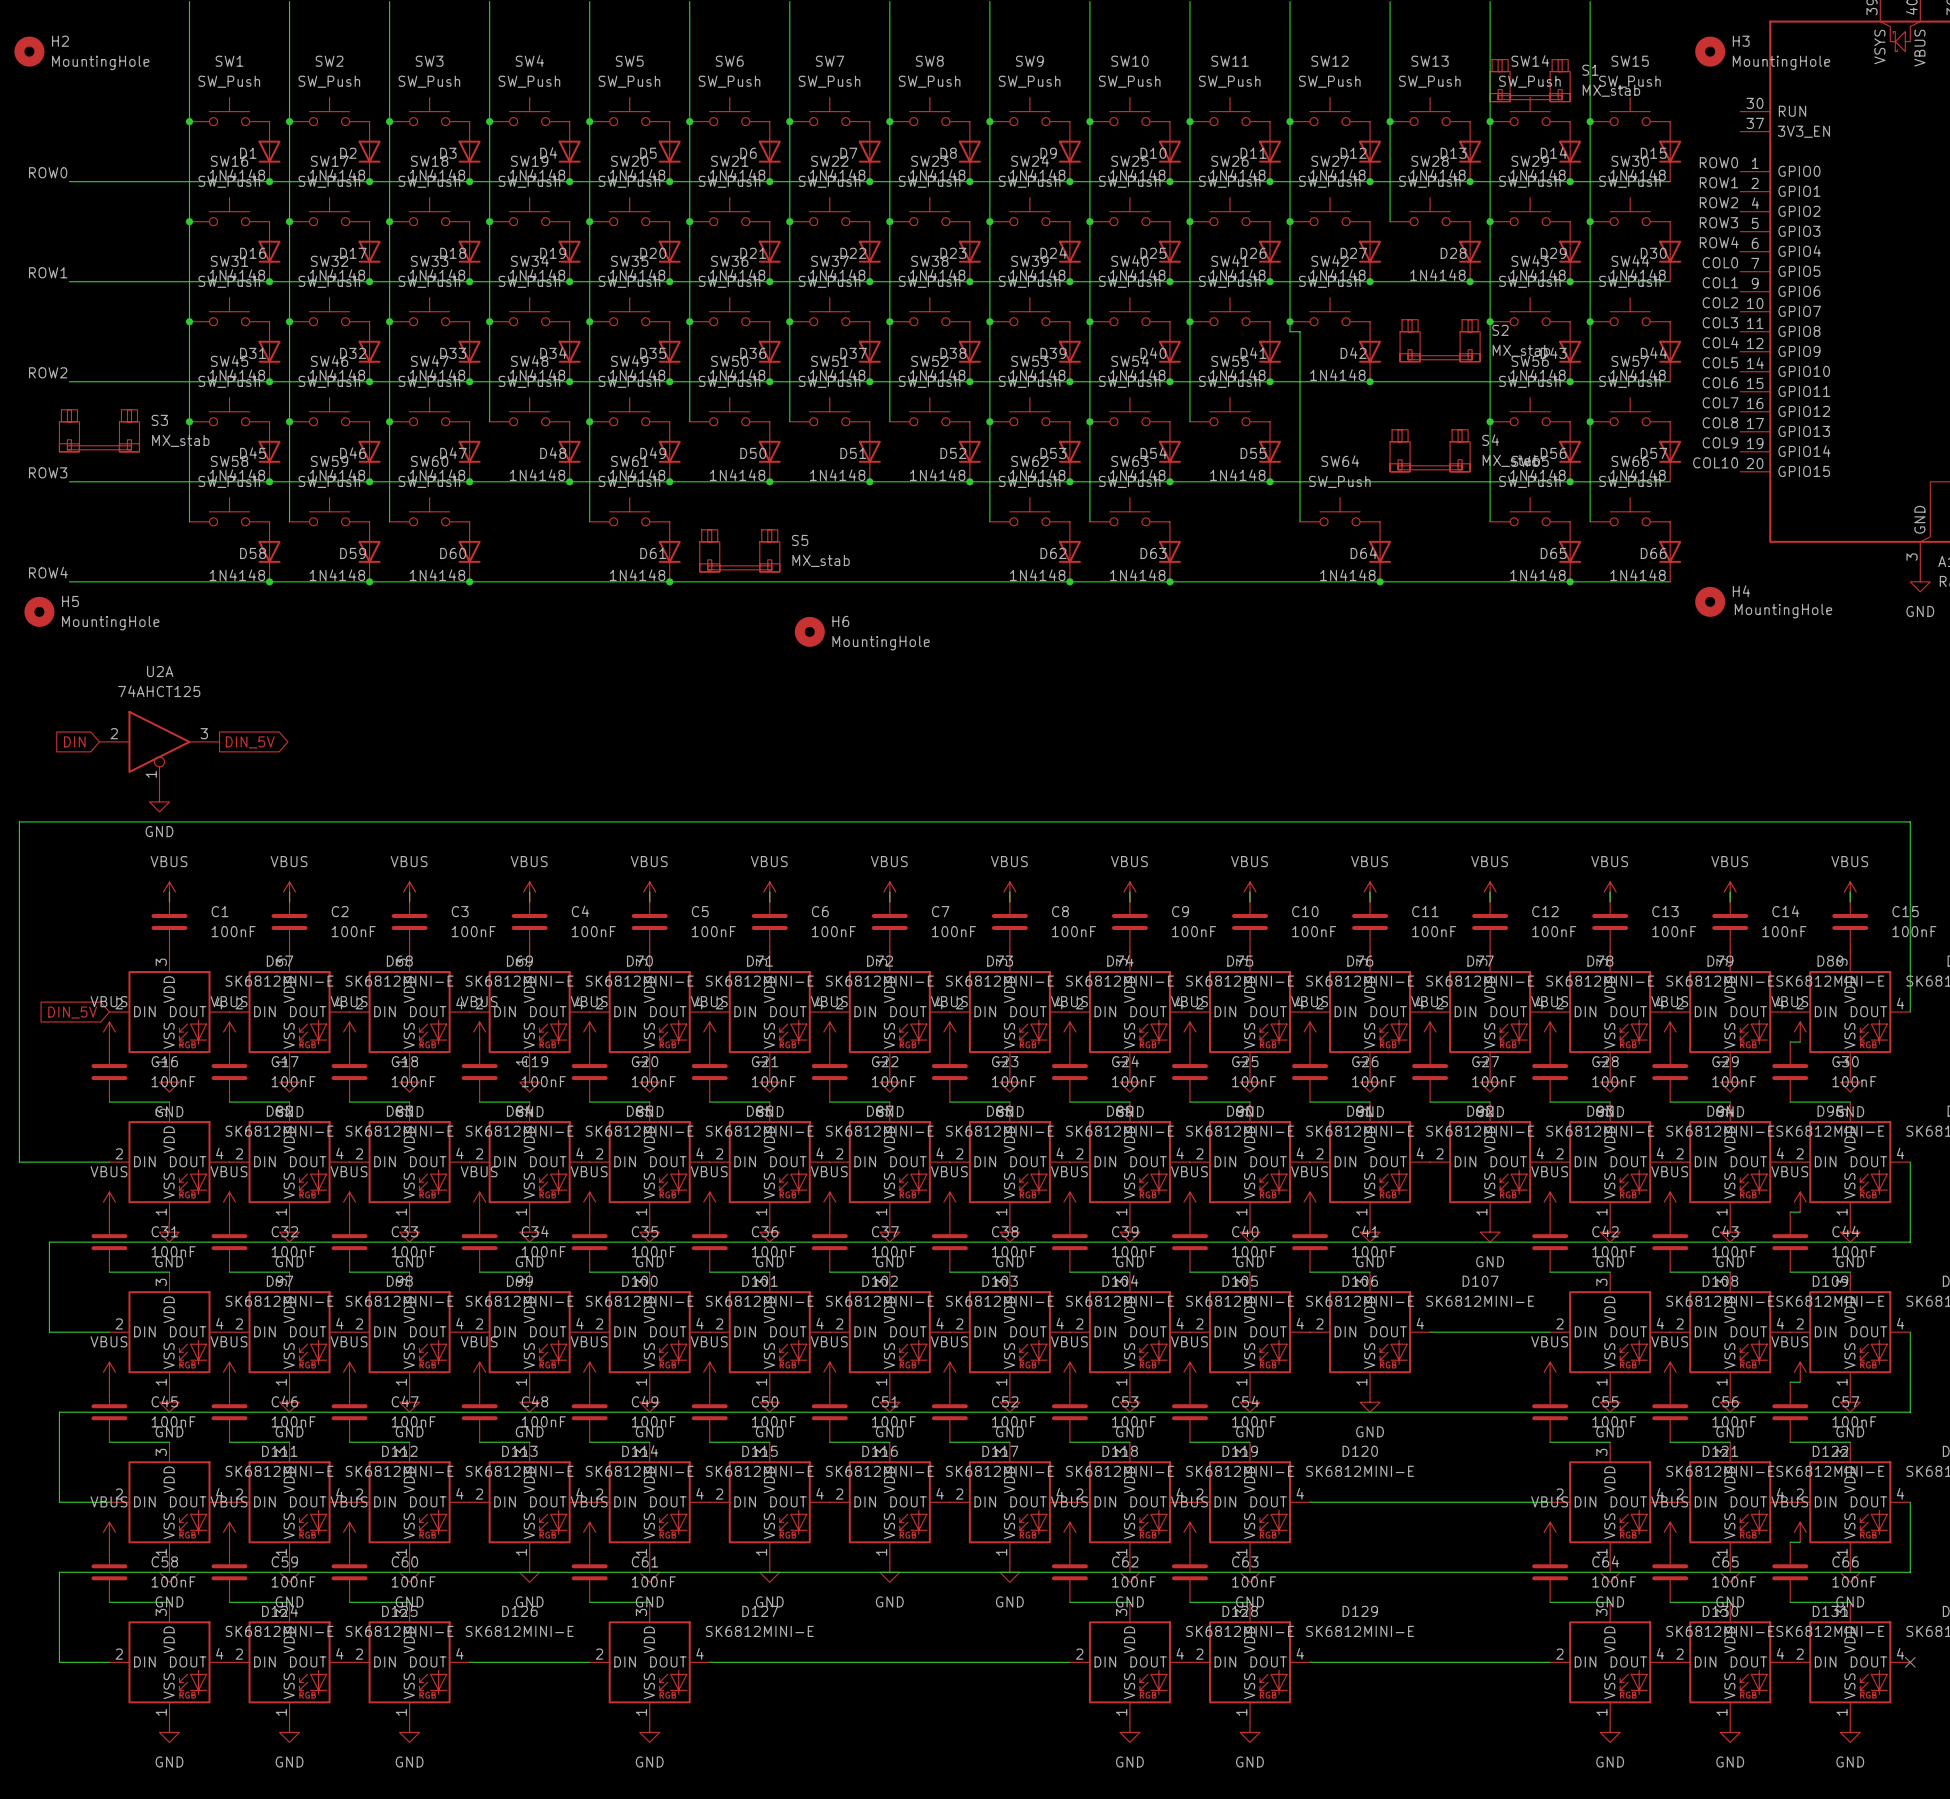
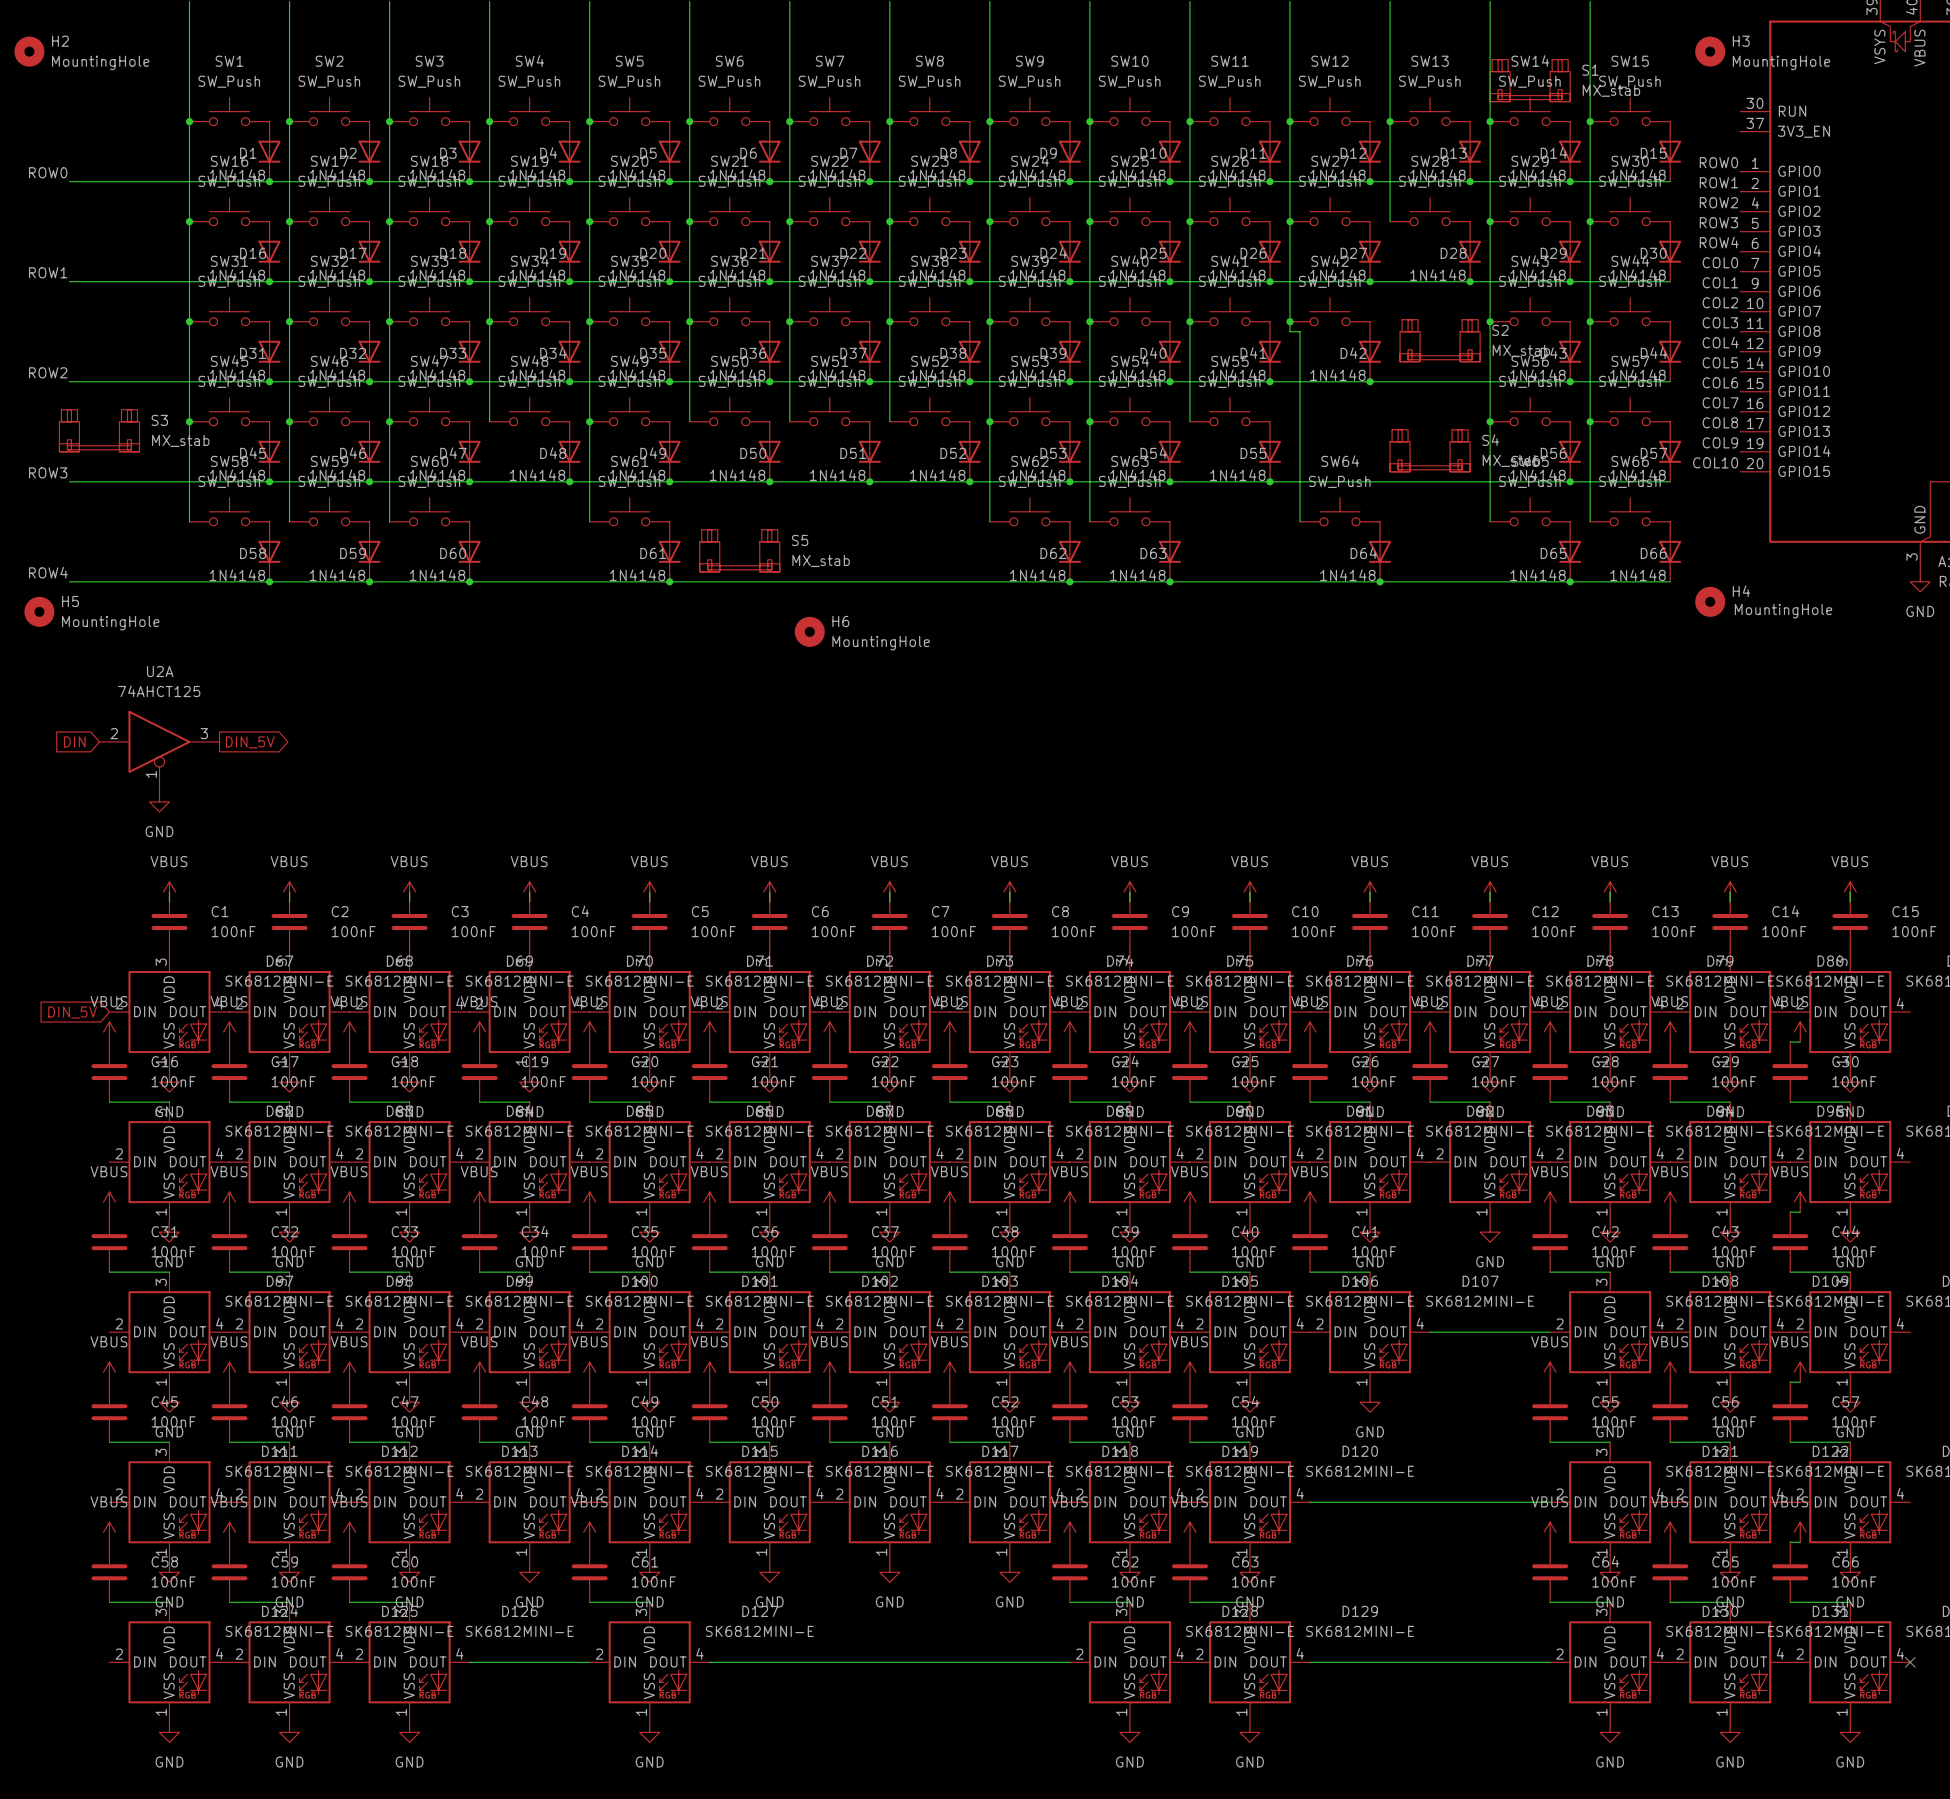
wire: (1910, 1012) (1910, 821) (19, 821) (19, 1162) (109, 1162) -> none
wire: (1910, 1162) (1910, 1242) (49, 1242) (49, 1332) (109, 1332) -> none
wire: (1910, 1332) (1910, 1412) (59, 1412) (59, 1502) (109, 1502) -> none
wire: (1910, 1502) (1910, 1572) (59, 1572) (59, 1662) (109, 1662) -> none

